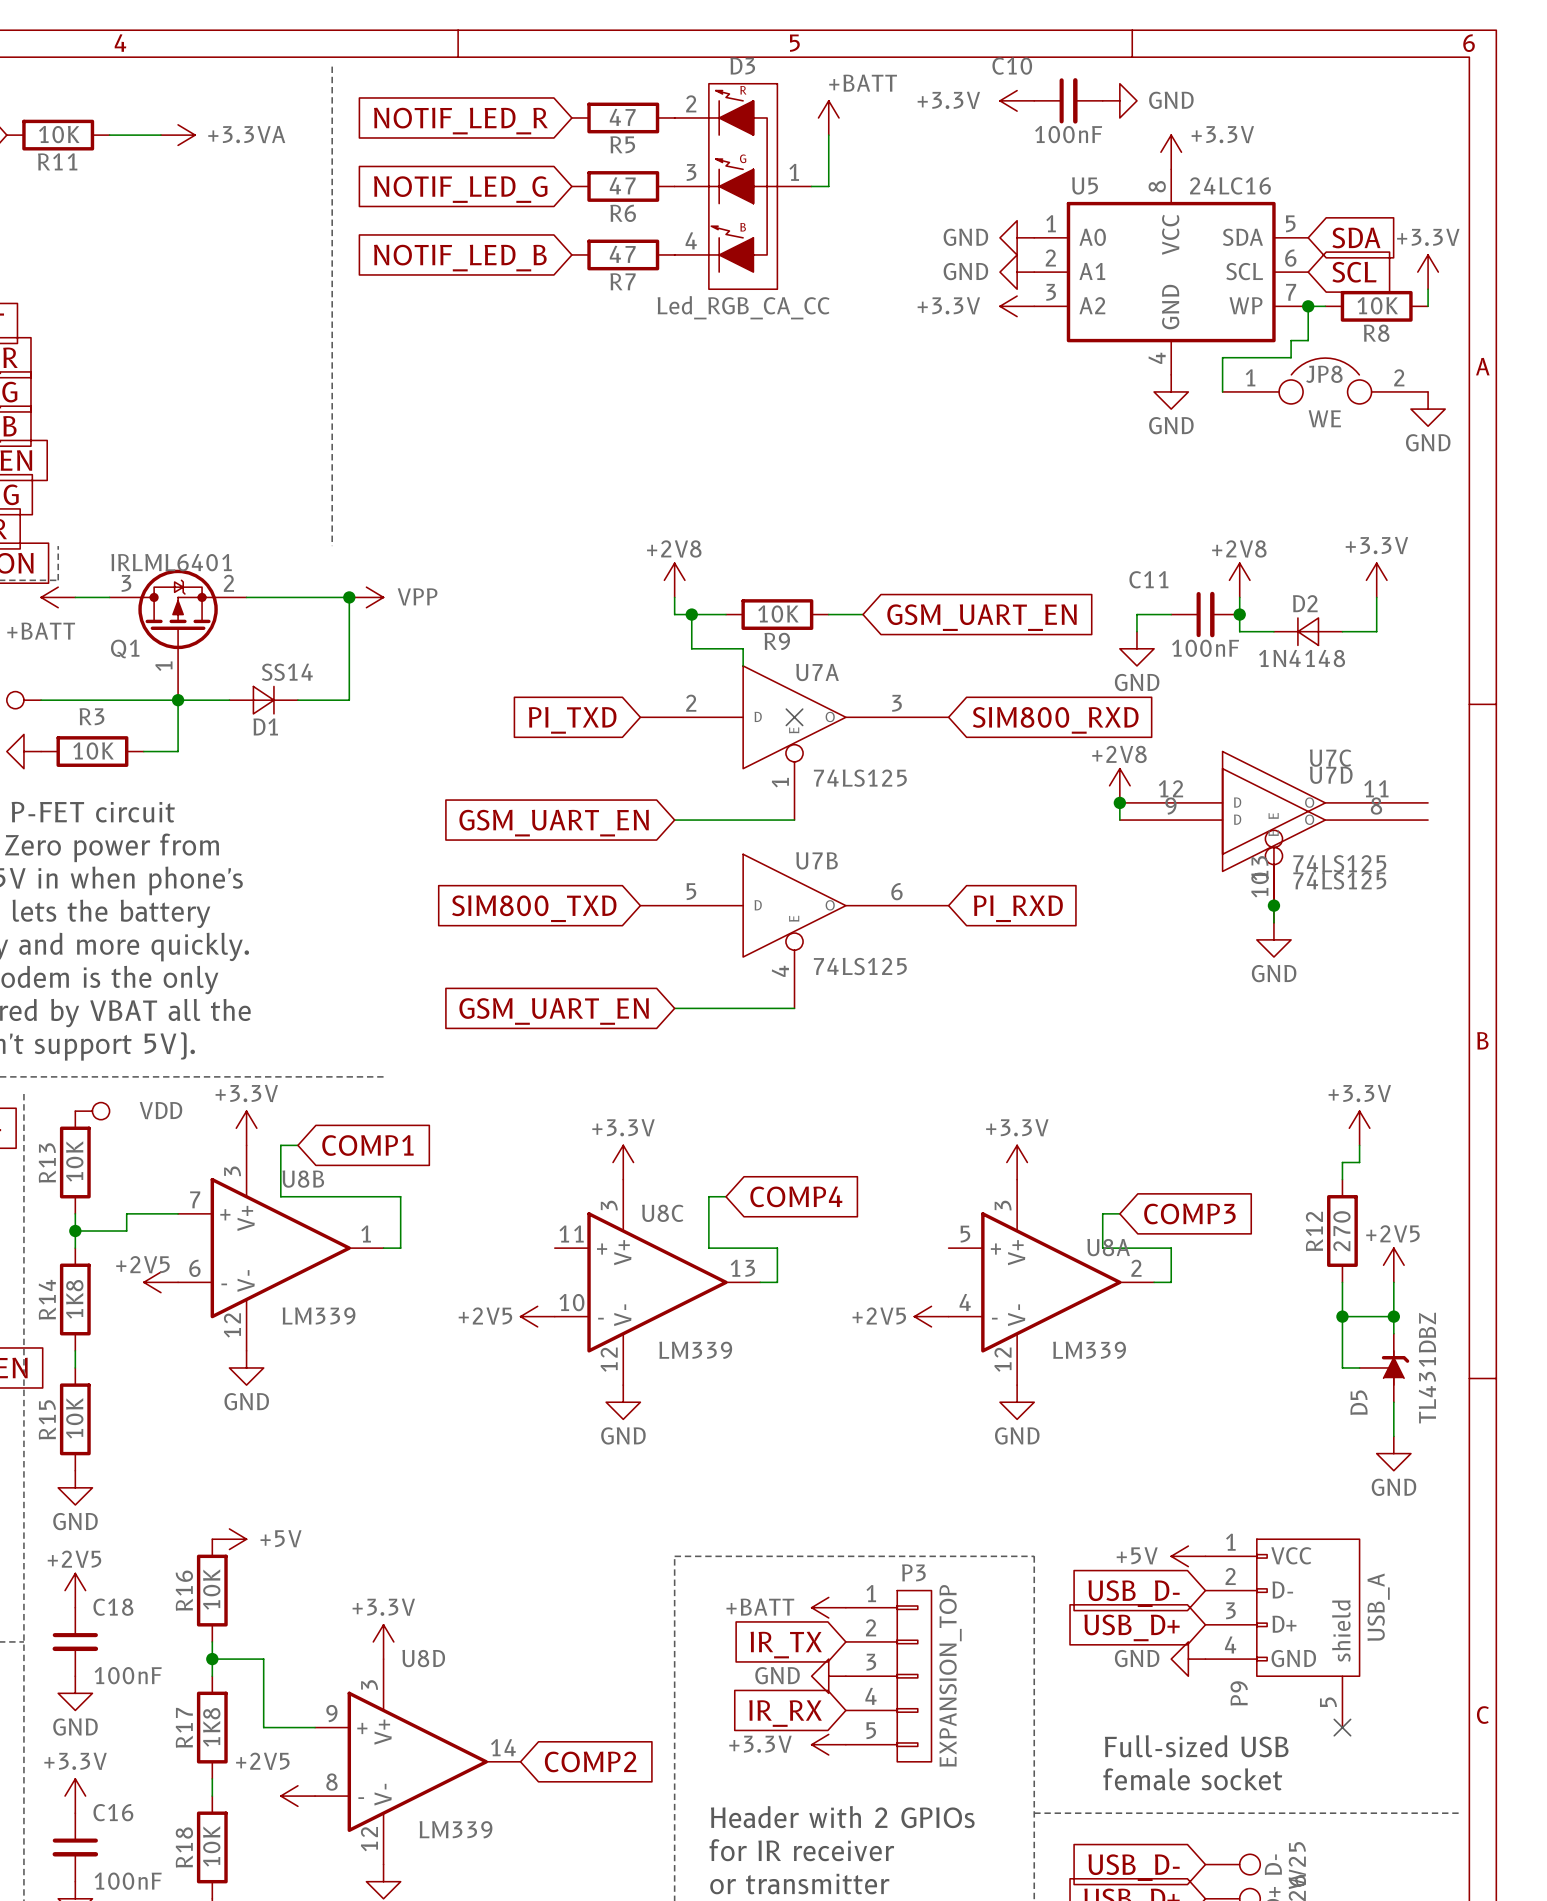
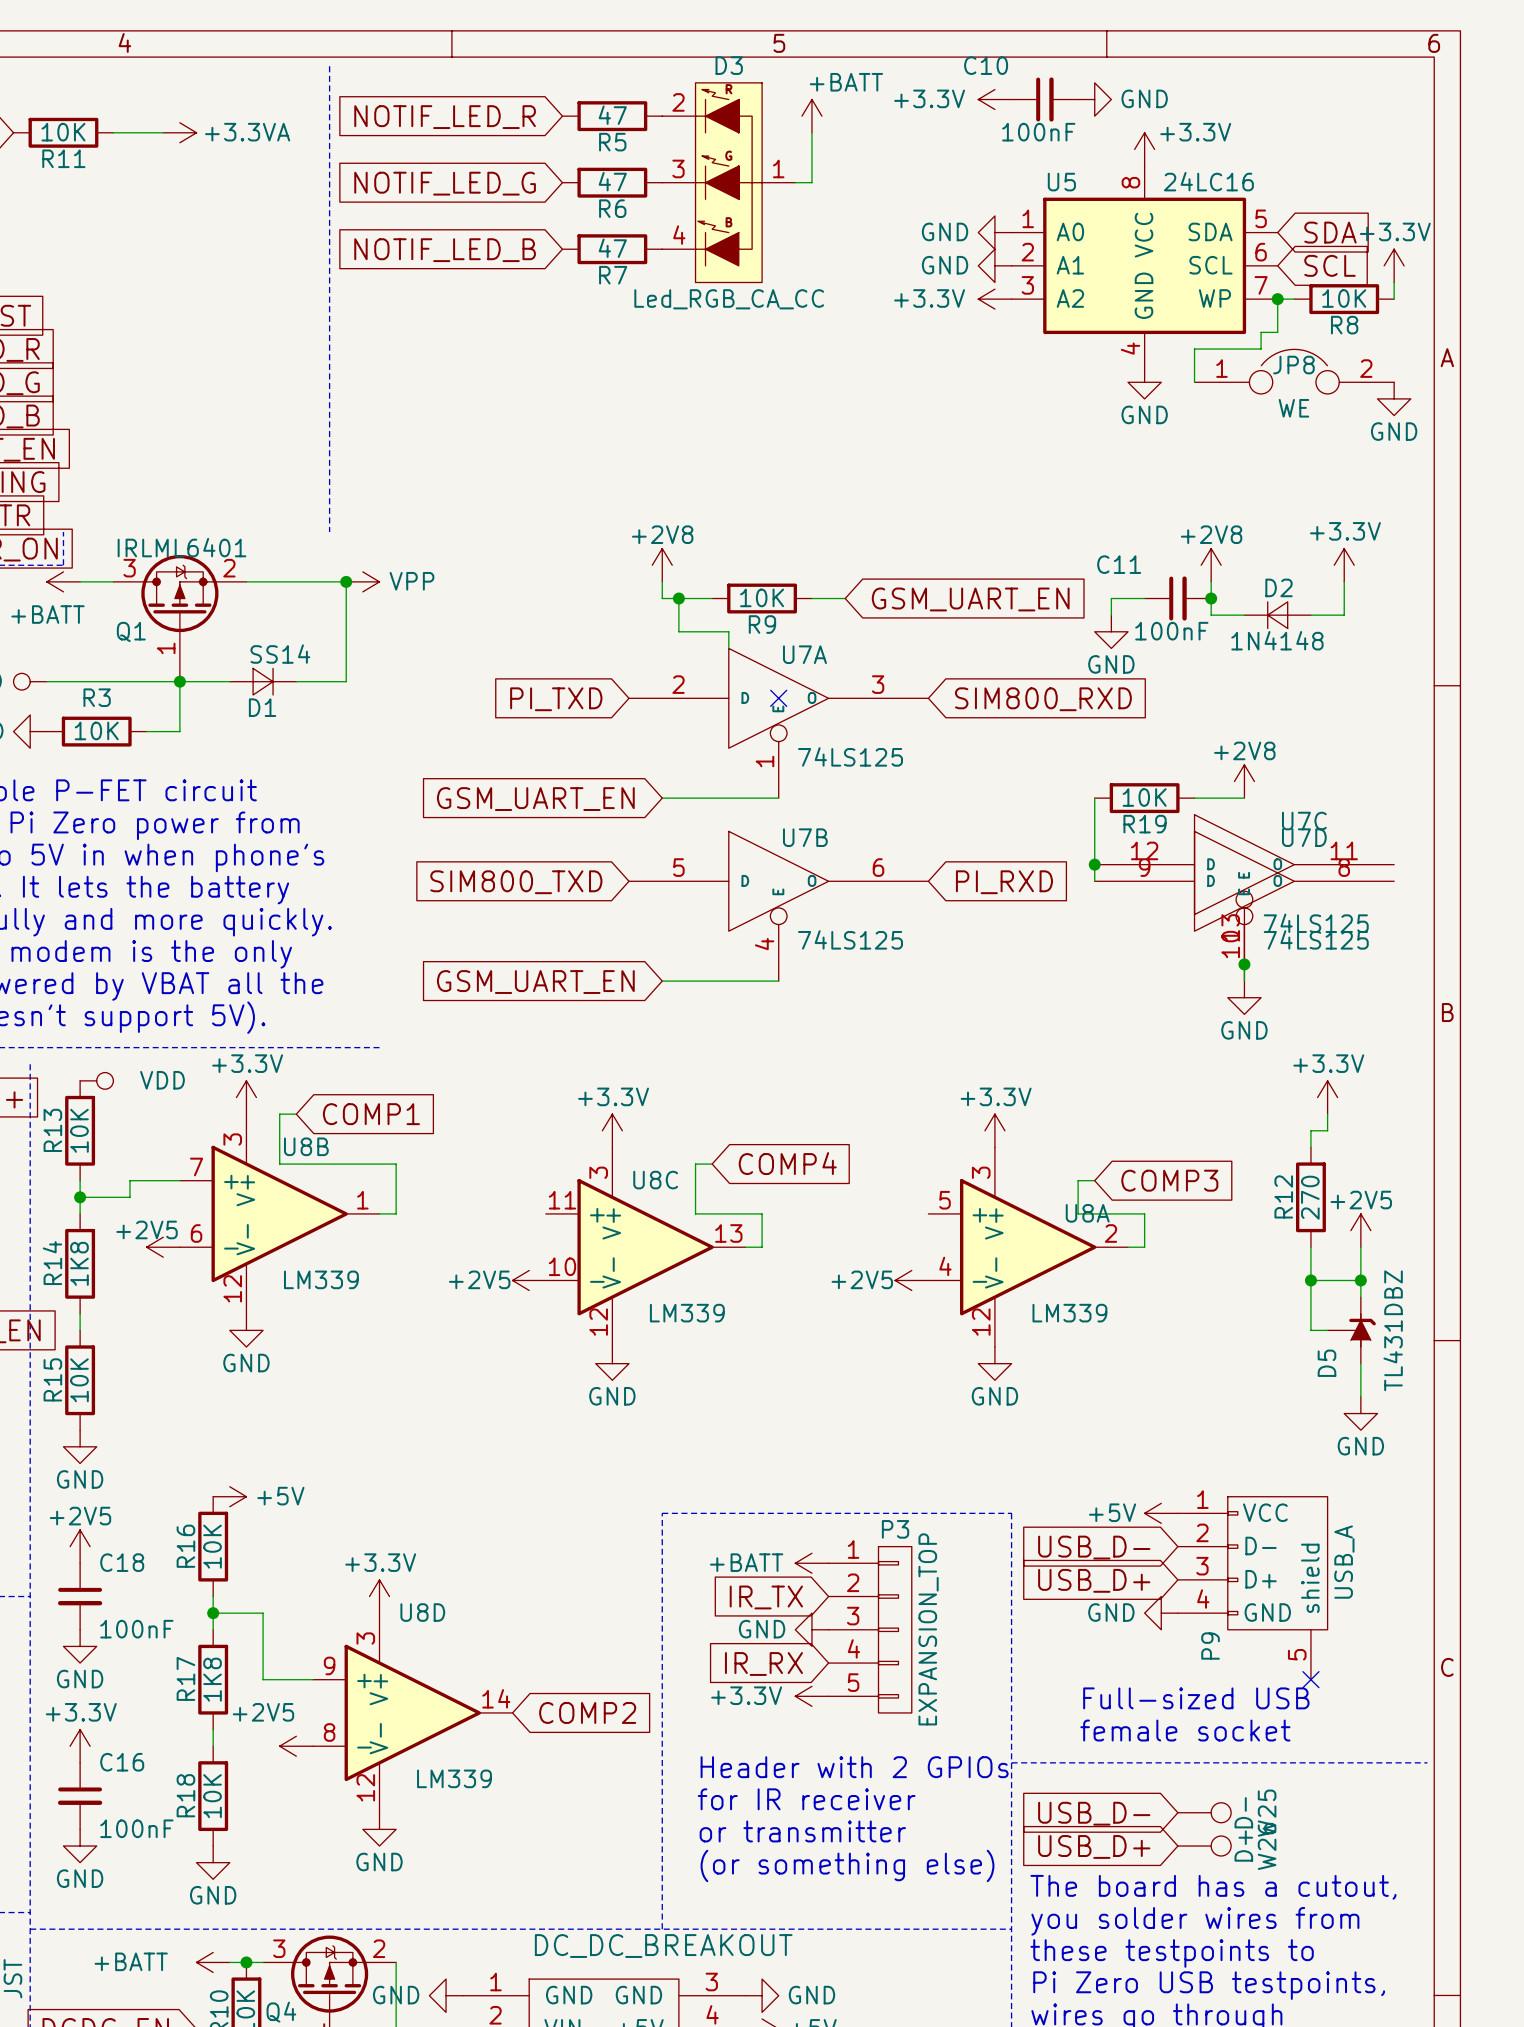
power symbol position: +2V8 (1119, 785) -> +2V8 (1244, 781)
wire: (1119, 802) (1119, 820) -> (1094, 881) (1094, 798)
junction: (1119, 802) -> none
R19: none -> 10K (1144, 798)
wire: none -> (1194, 798) (1244, 798)
U7D position: (1273, 828) -> (1244, 889)
U7C position: (1273, 845) -> (1244, 906)
junction: none -> (1094, 864)
wire: (1273, 905) (1273, 922) -> (1244, 964) (1244, 981)
junction: (1273, 905) -> none
power symbol position: GND (1273, 939) -> GND (1244, 997)
junction: none -> (1244, 964)

